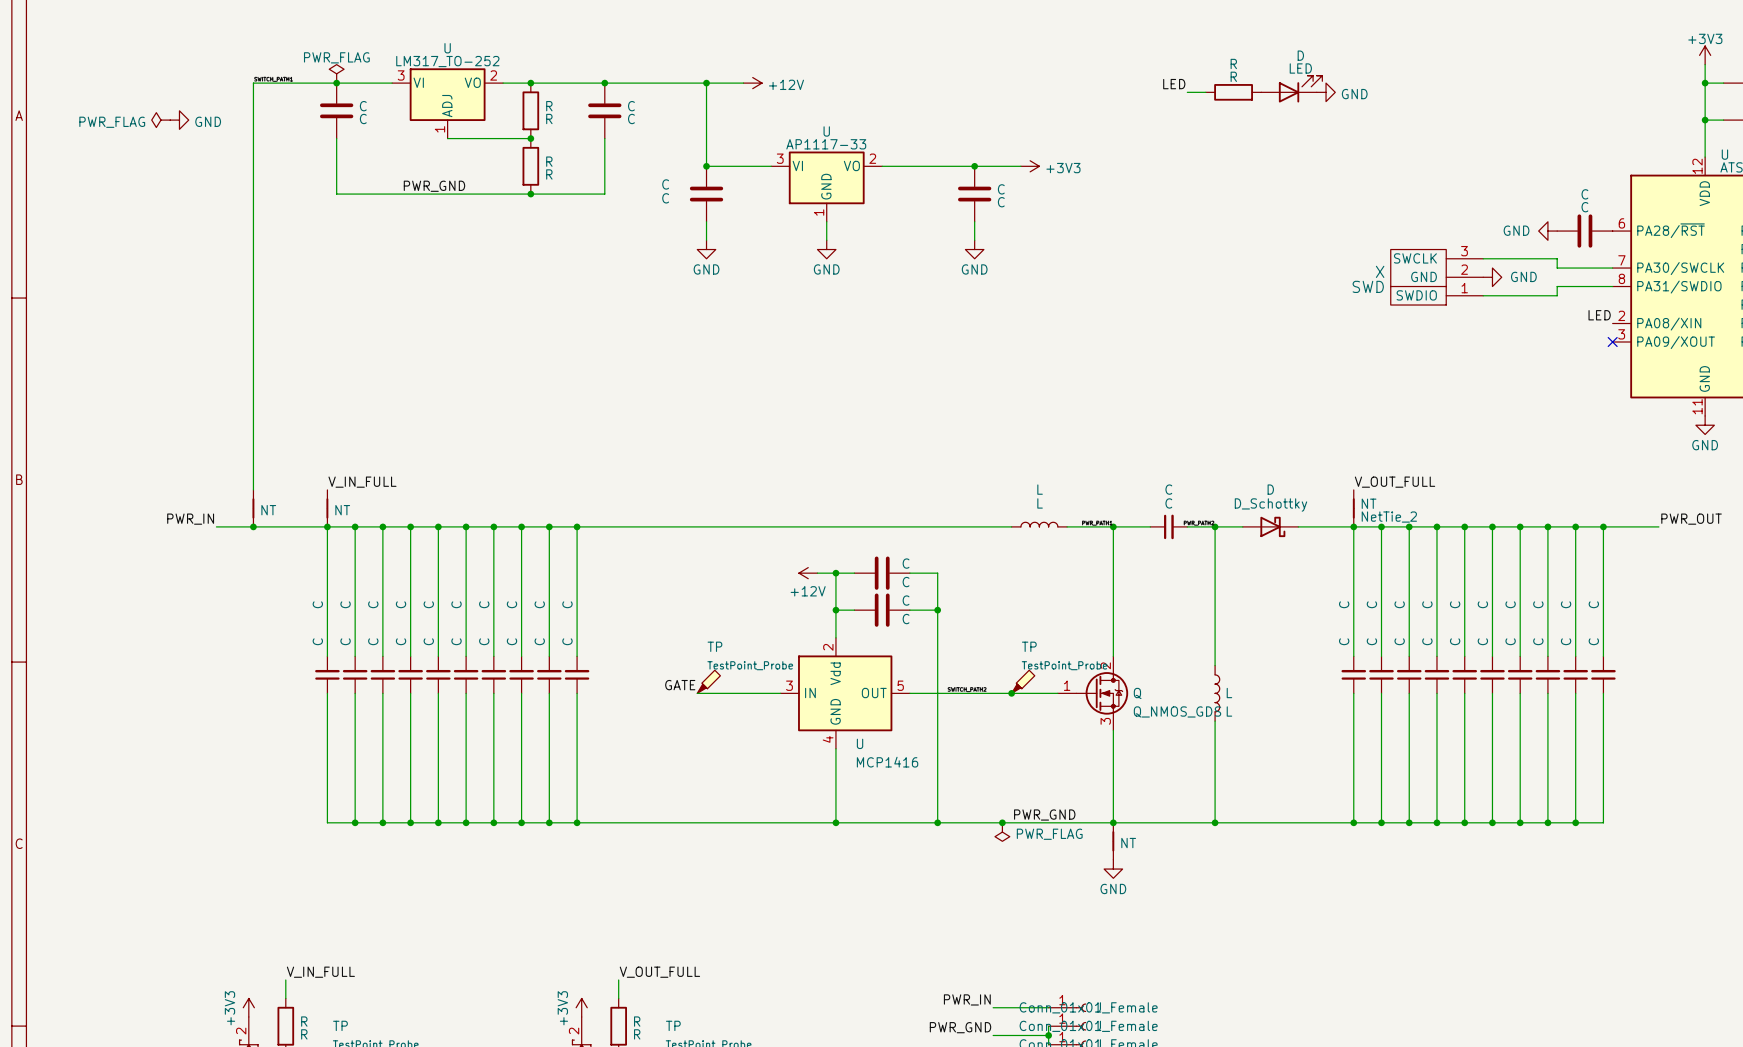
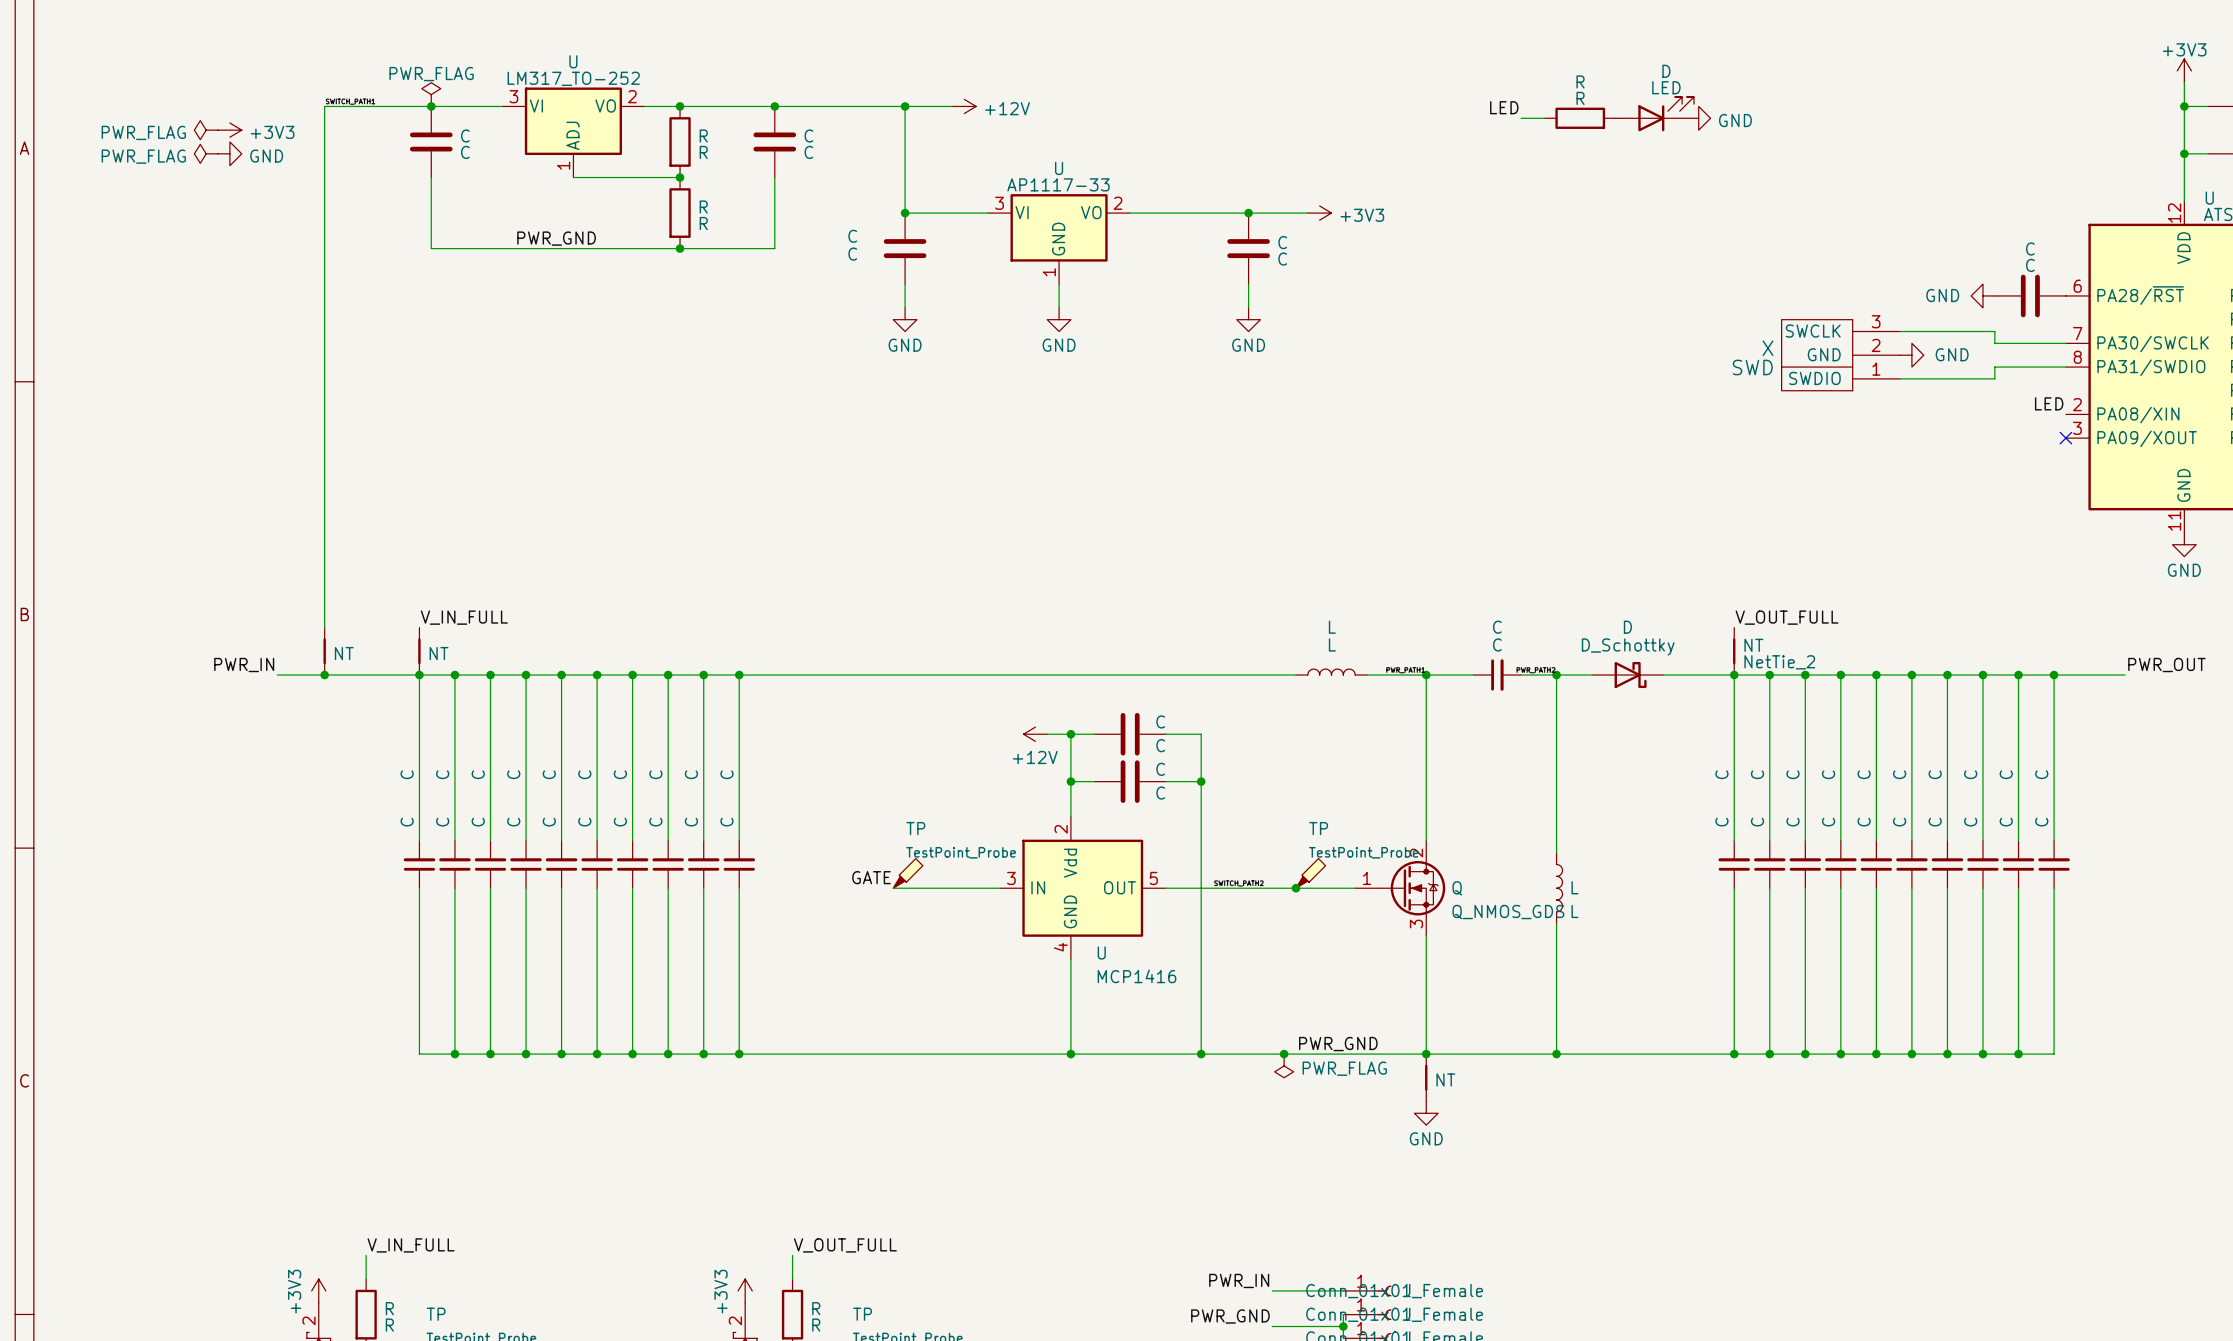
power symbol: none -> PWR_FLAG (206, 130)
power symbol: none -> +3V3 (229, 130)

